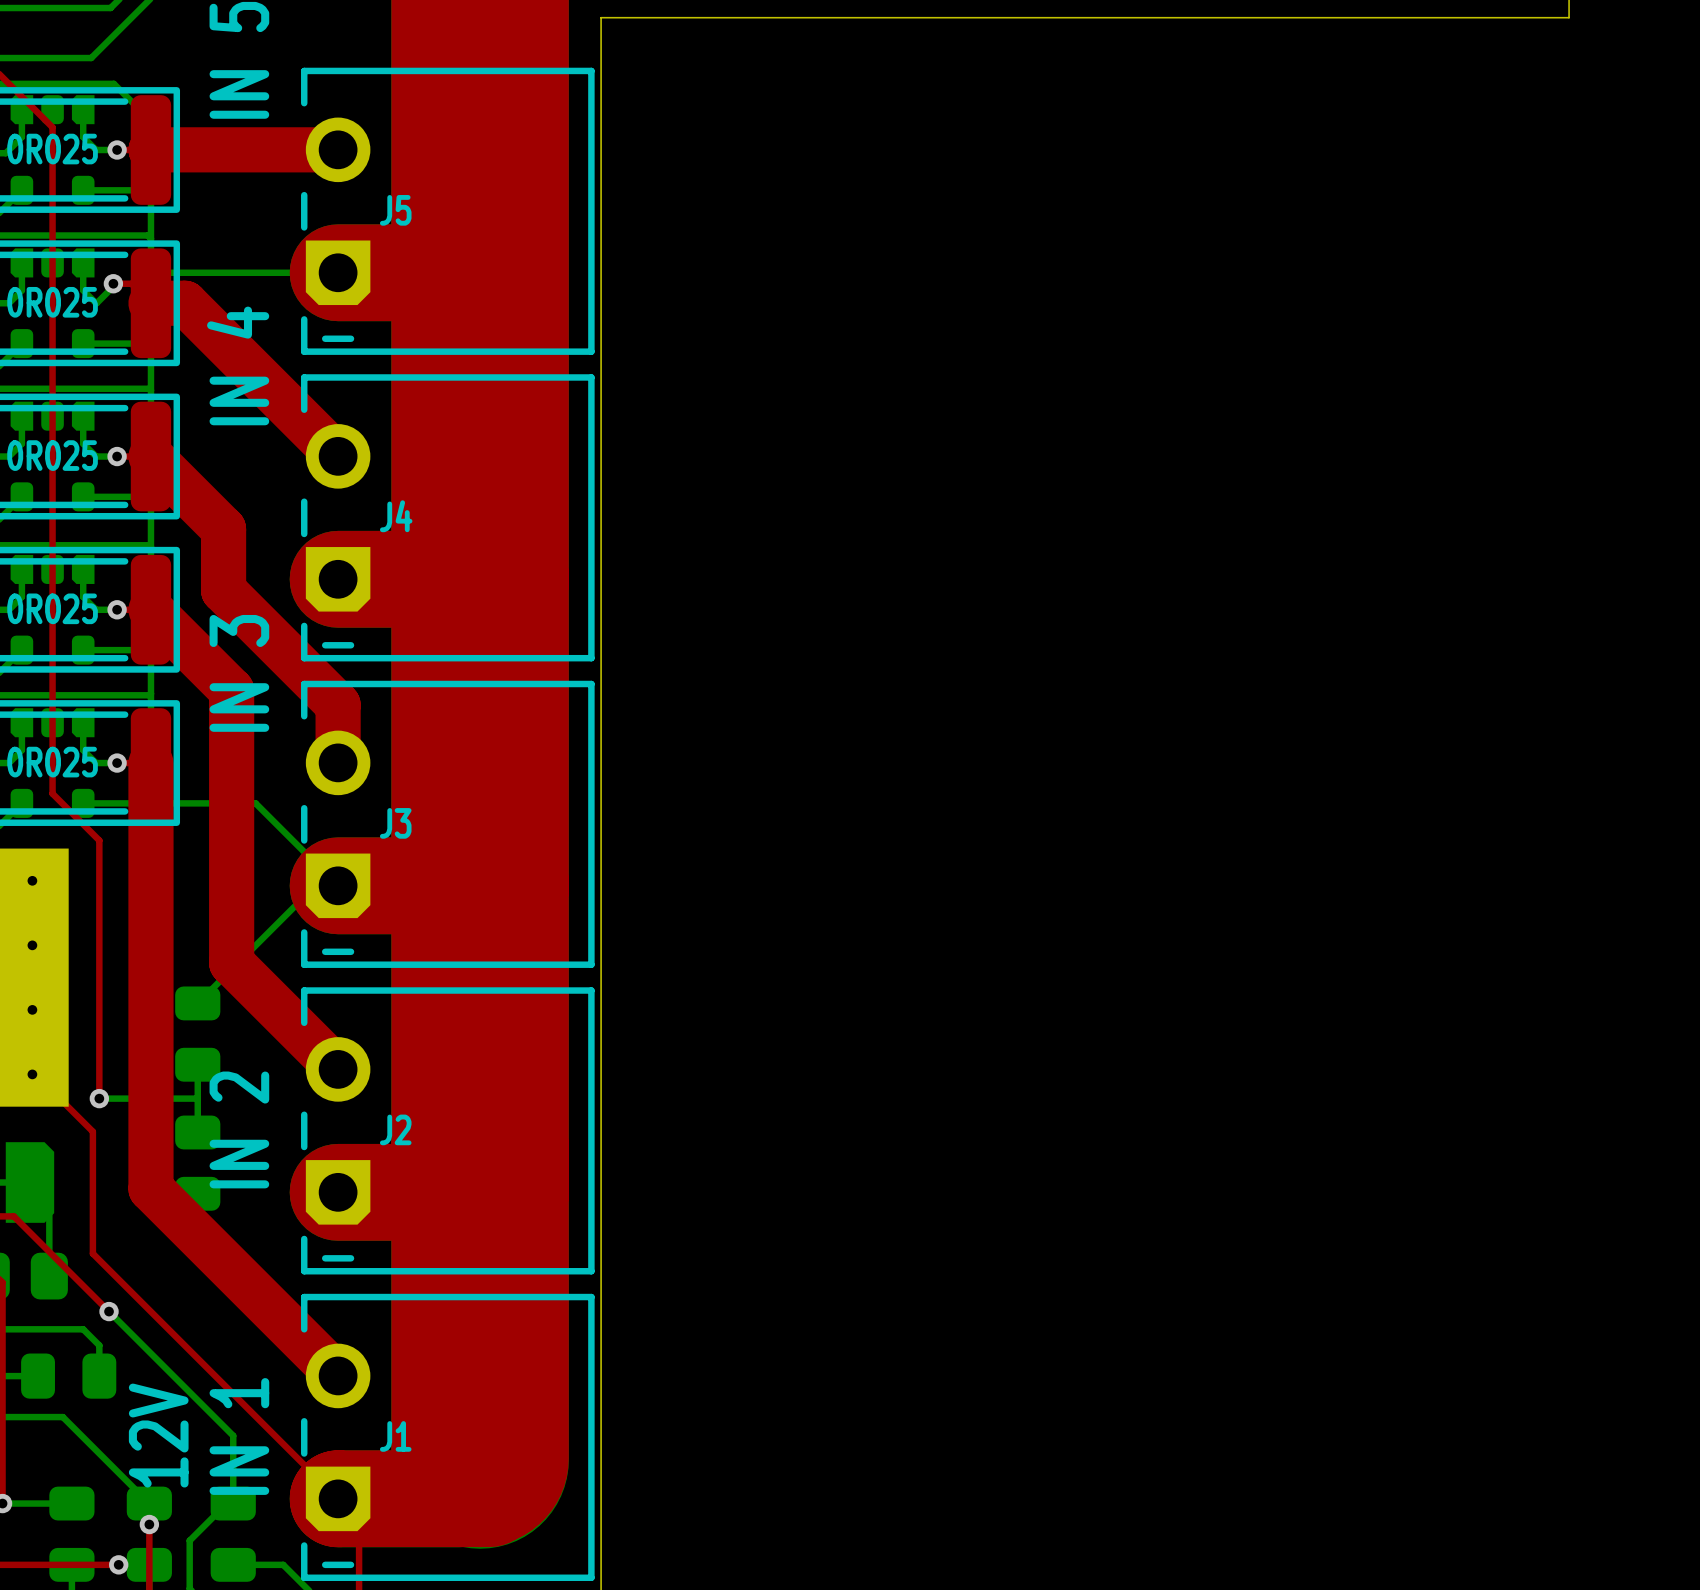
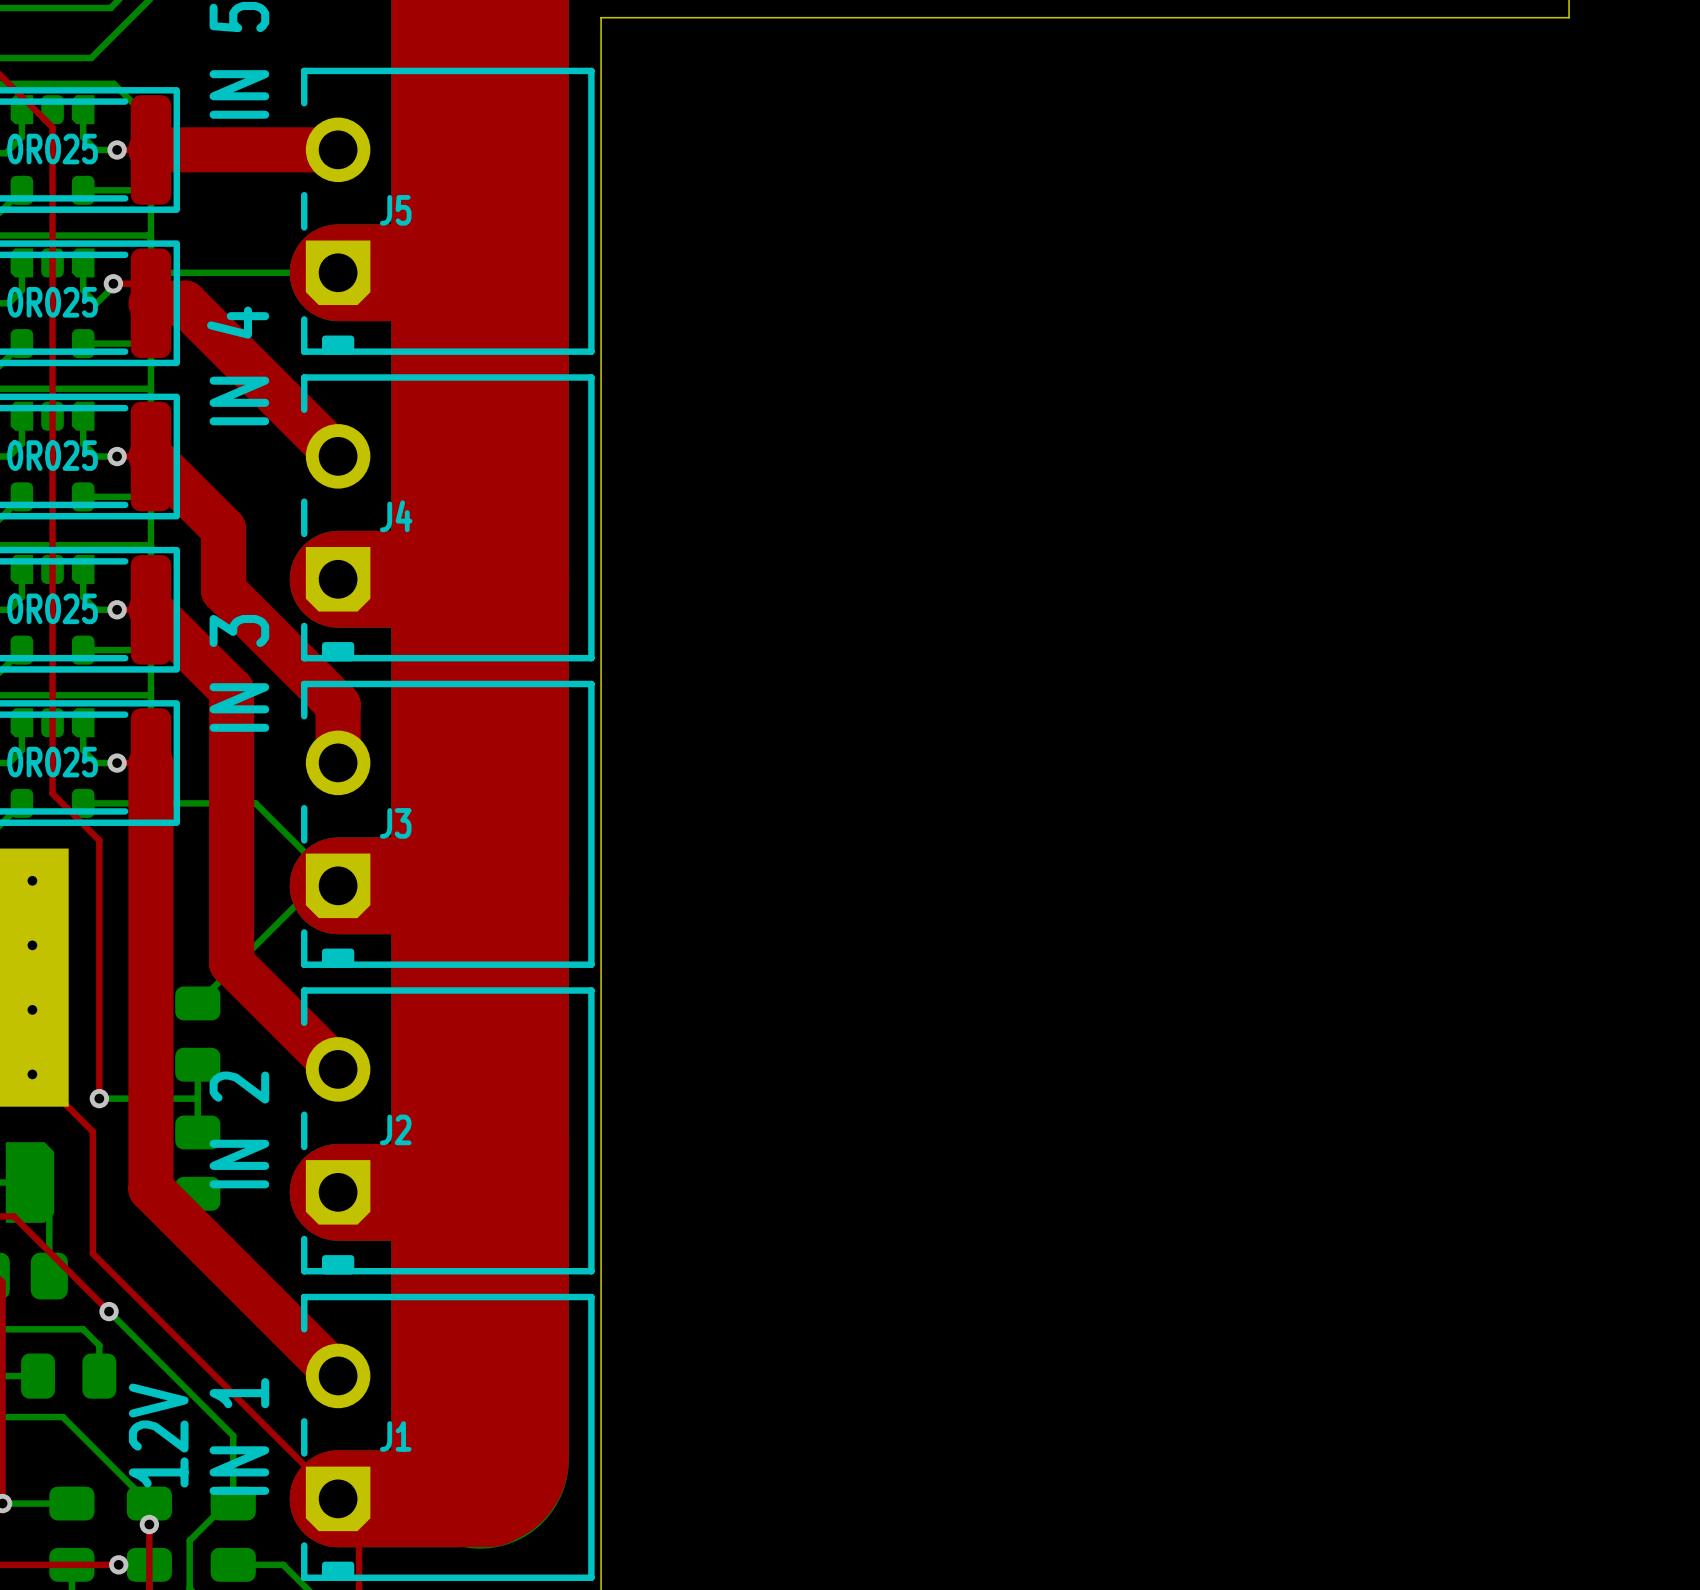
J5 footprint: [301, 67, 595, 355] -> [301, 67, 595, 355]
J4 footprint: [301, 374, 595, 662] -> [301, 374, 595, 662]
J3 footprint: [301, 680, 595, 968] -> [301, 680, 595, 968]
J2 footprint: [301, 987, 595, 1275] -> [301, 987, 595, 1275]
J1 footprint: [301, 1293, 595, 1581] -> [301, 1293, 595, 1581]

